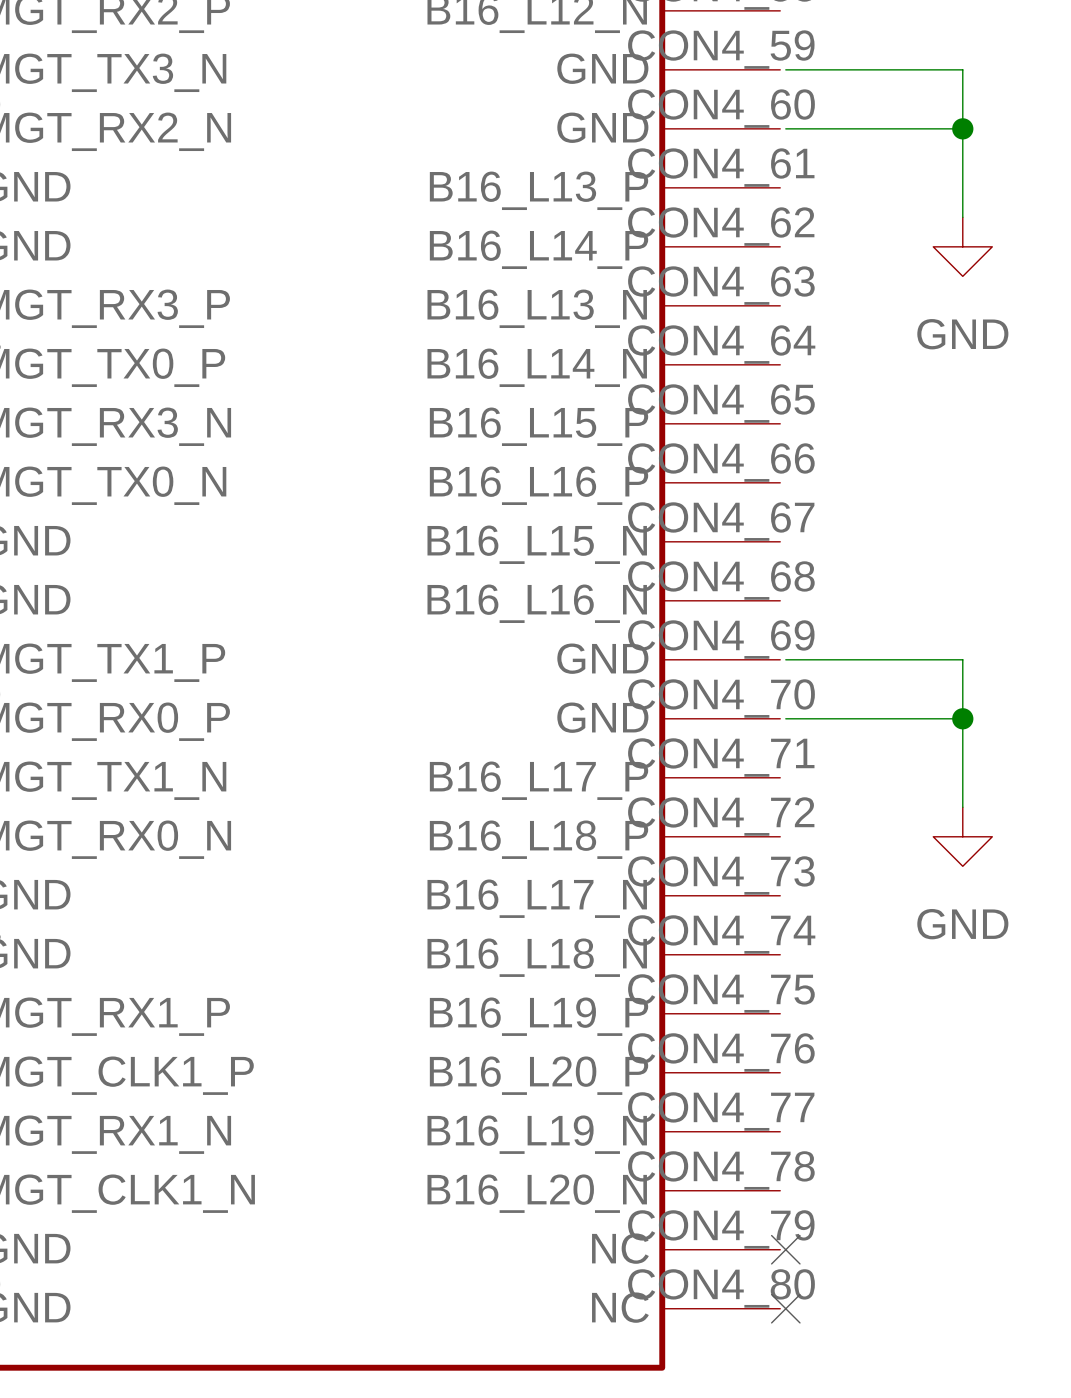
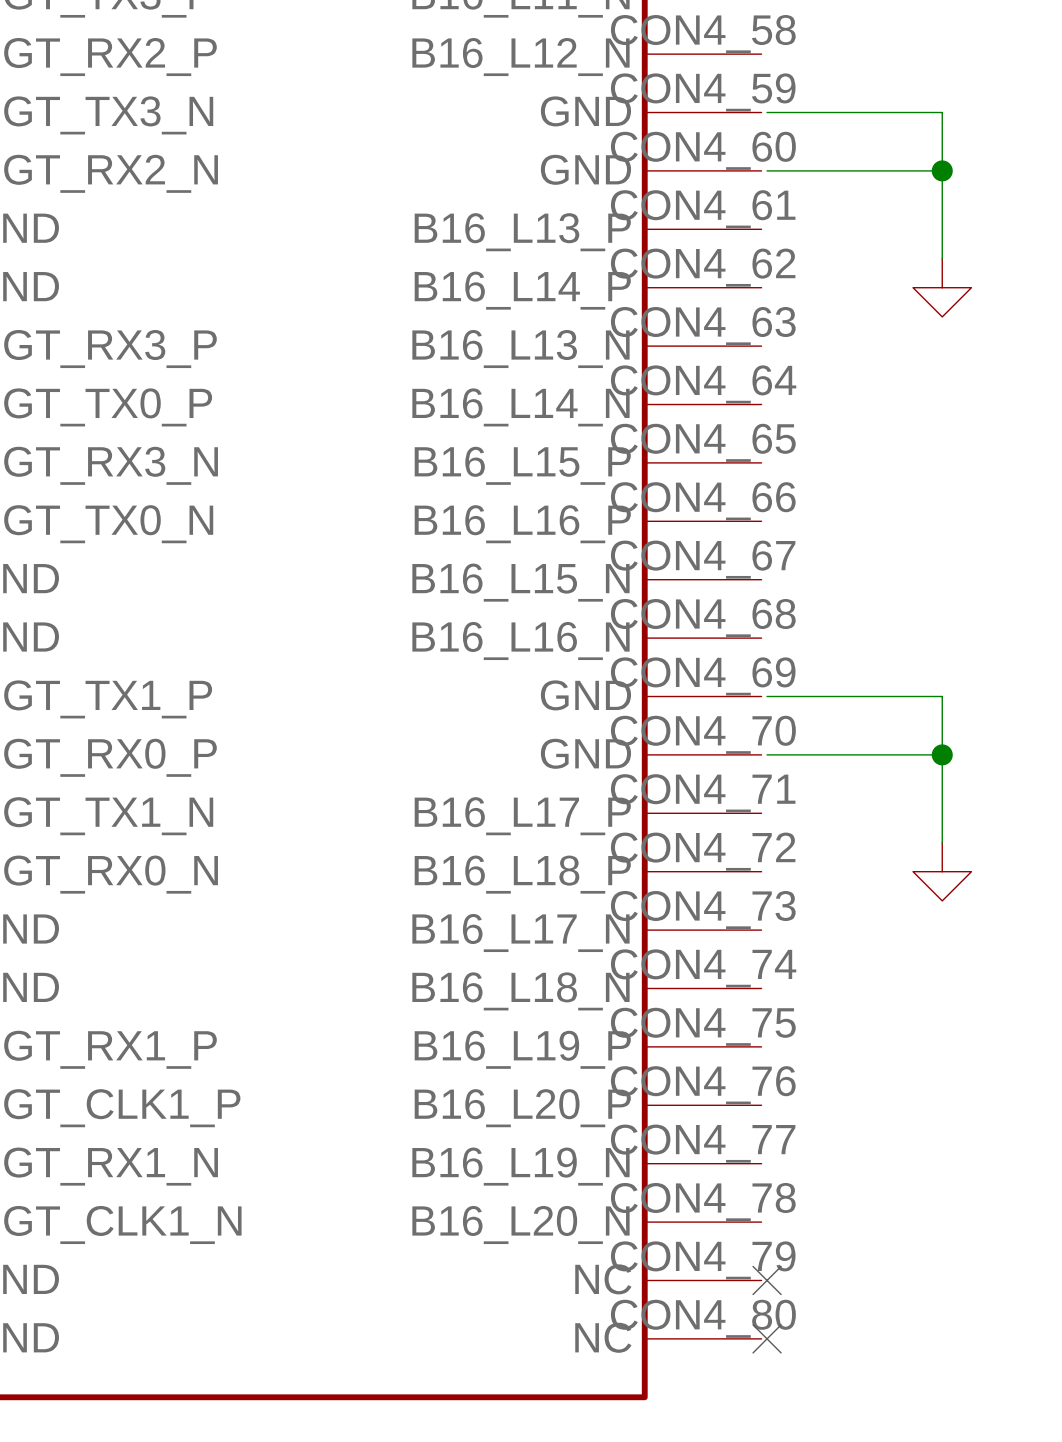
power symbol text: GND (962, 334) -> none
power symbol text: GND (962, 924) -> none

